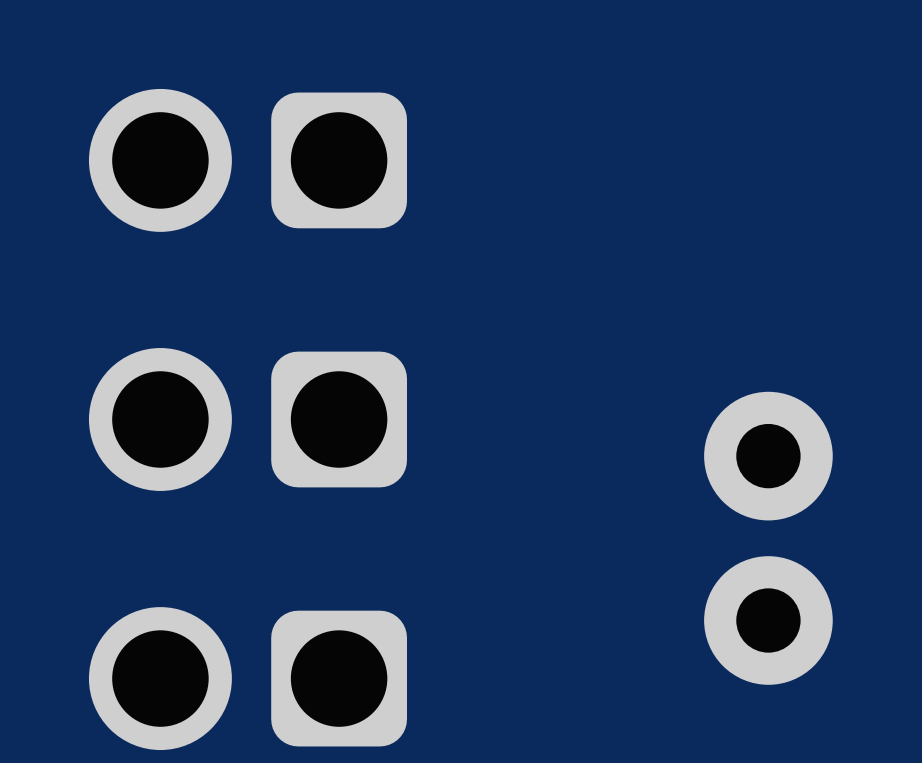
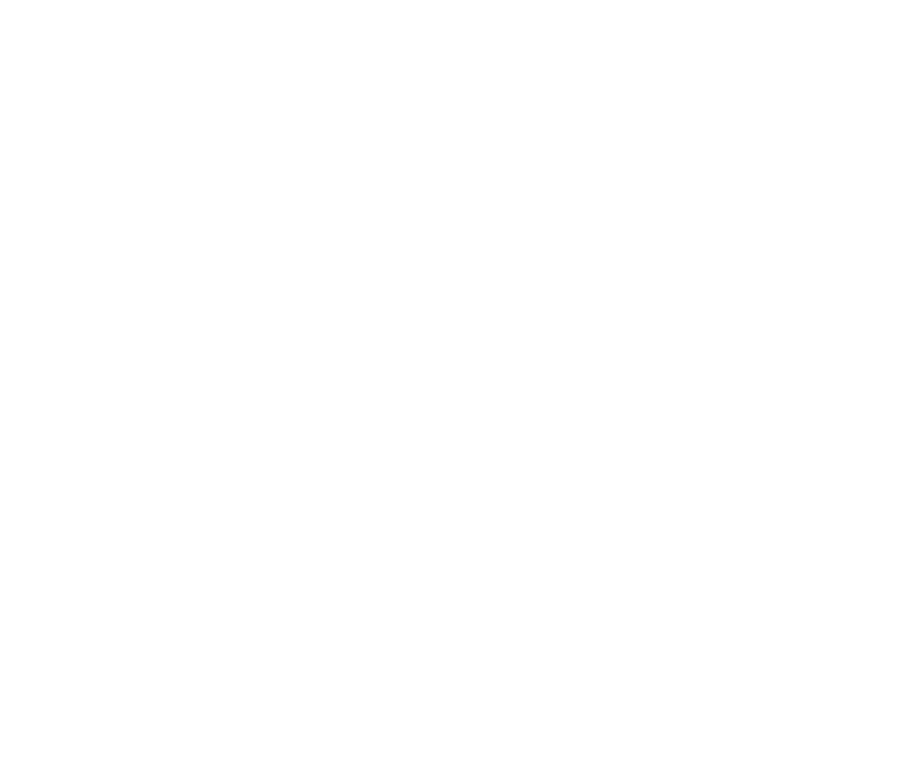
part: (247, 160) -> none
part: (247, 419) -> none
part: (768, 456) -> none
part: (768, 620) -> none
part: (247, 678) -> none

